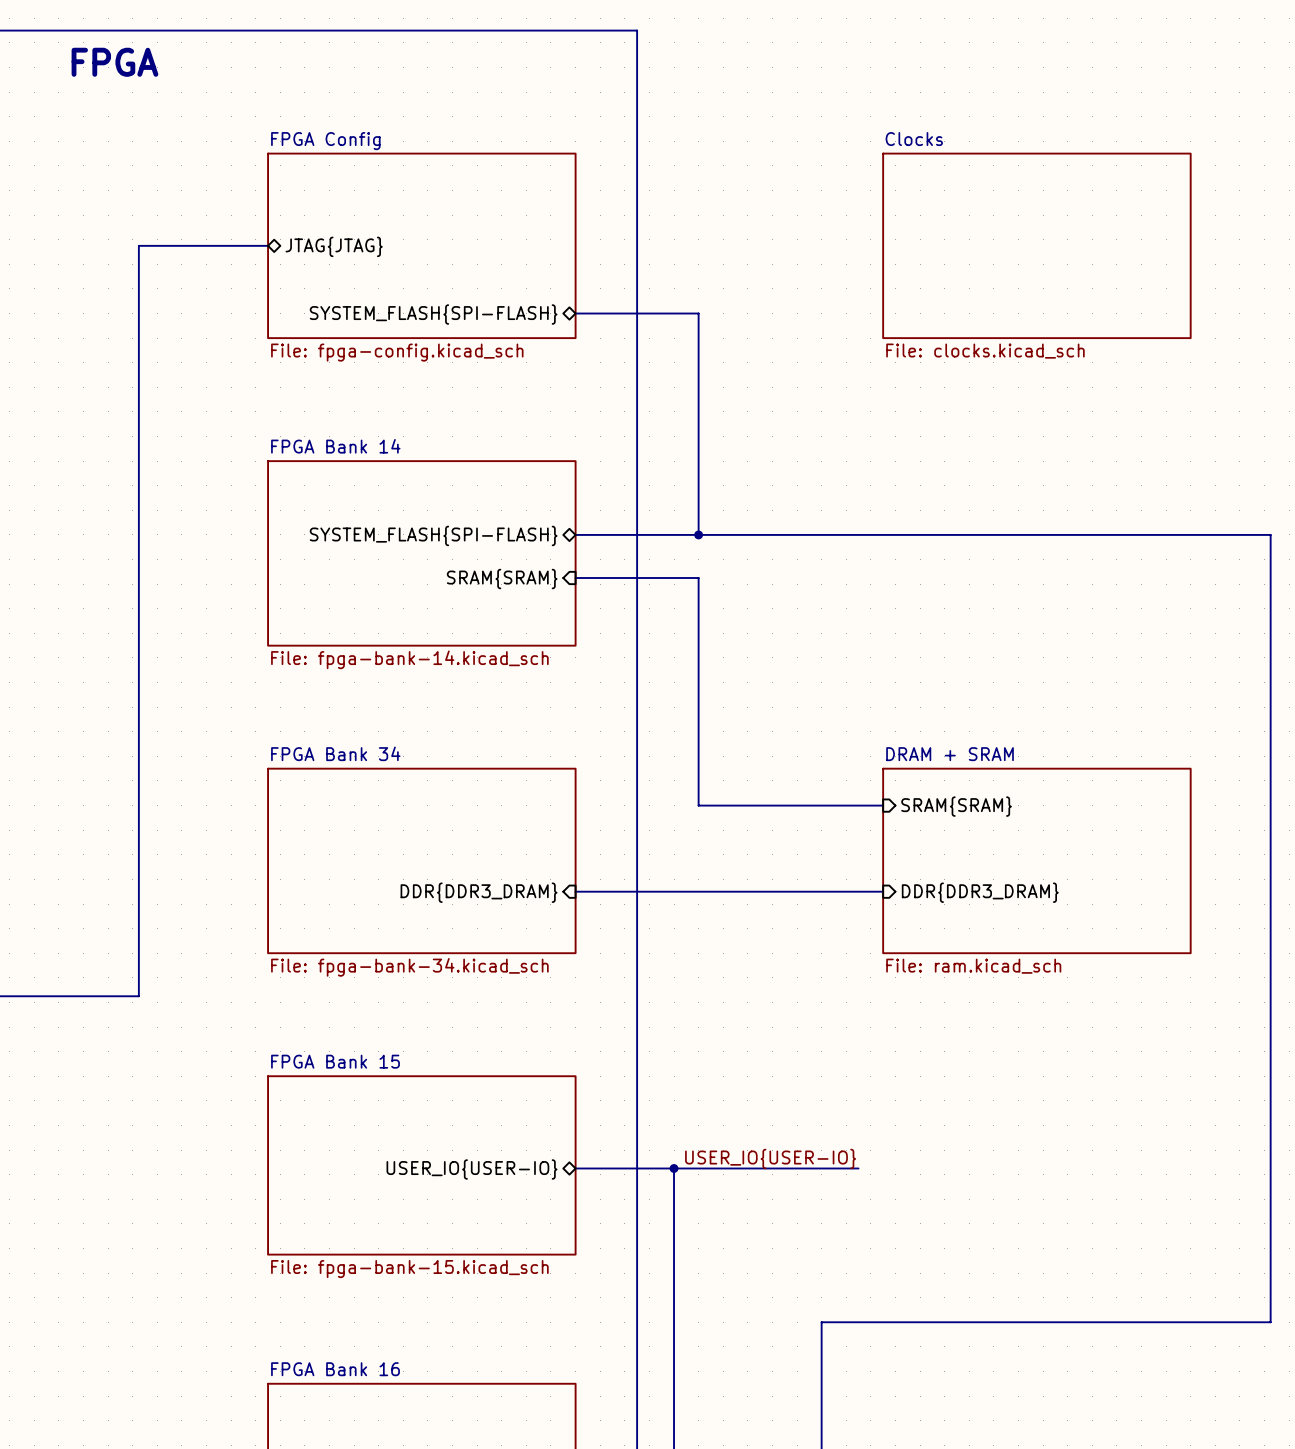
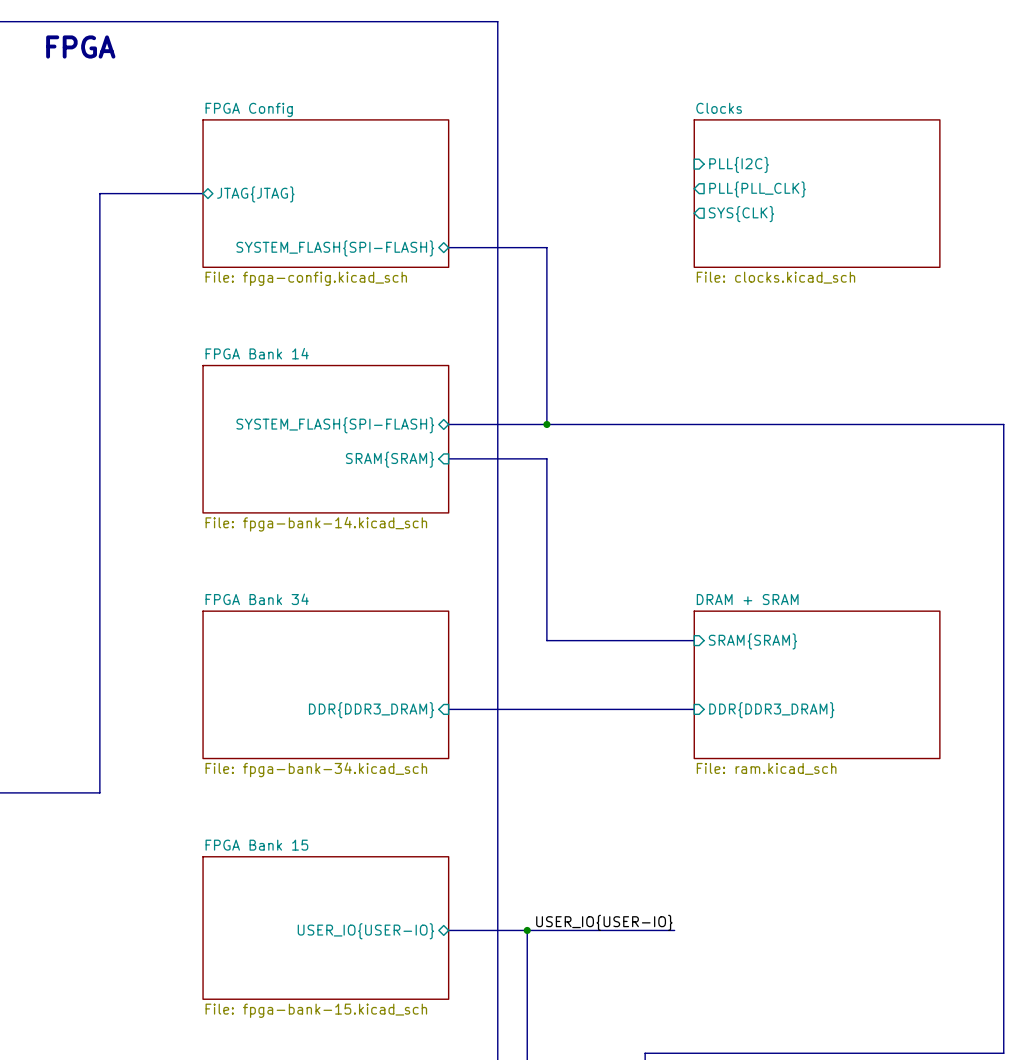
sheet pin: none -> PLL{I2C} (739, 164)
sheet pin: none -> PLL{PLL_CLK} (757, 189)
sheet pin: none -> SYS{CLK} (741, 214)

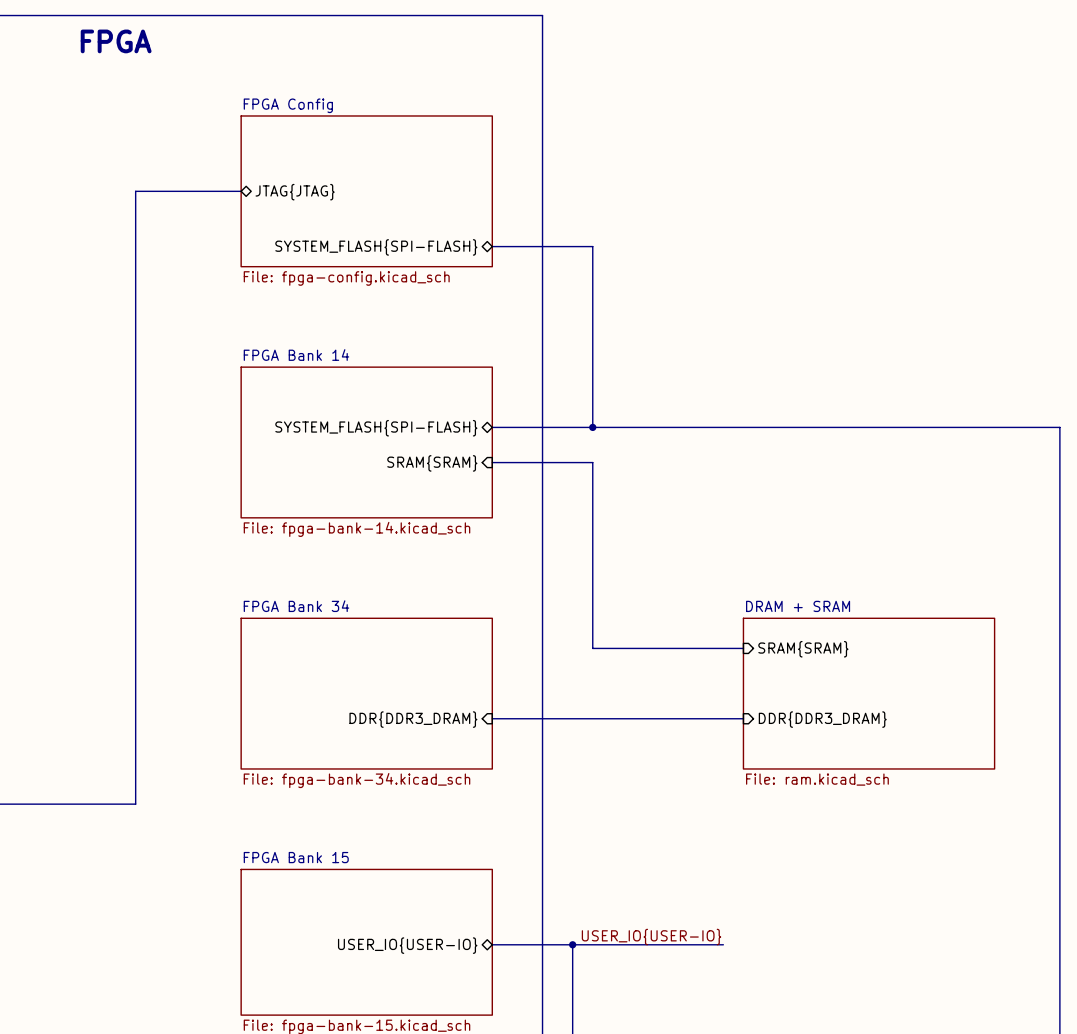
sheet pin: PLL{I2C} (739, 164) -> none
sheet pin: PLL{PLL_CLK} (757, 189) -> none
sheet Clocks: File: clocks.kicad_sch (817, 193) -> none
sheet pin: SYS{CLK} (741, 214) -> none

